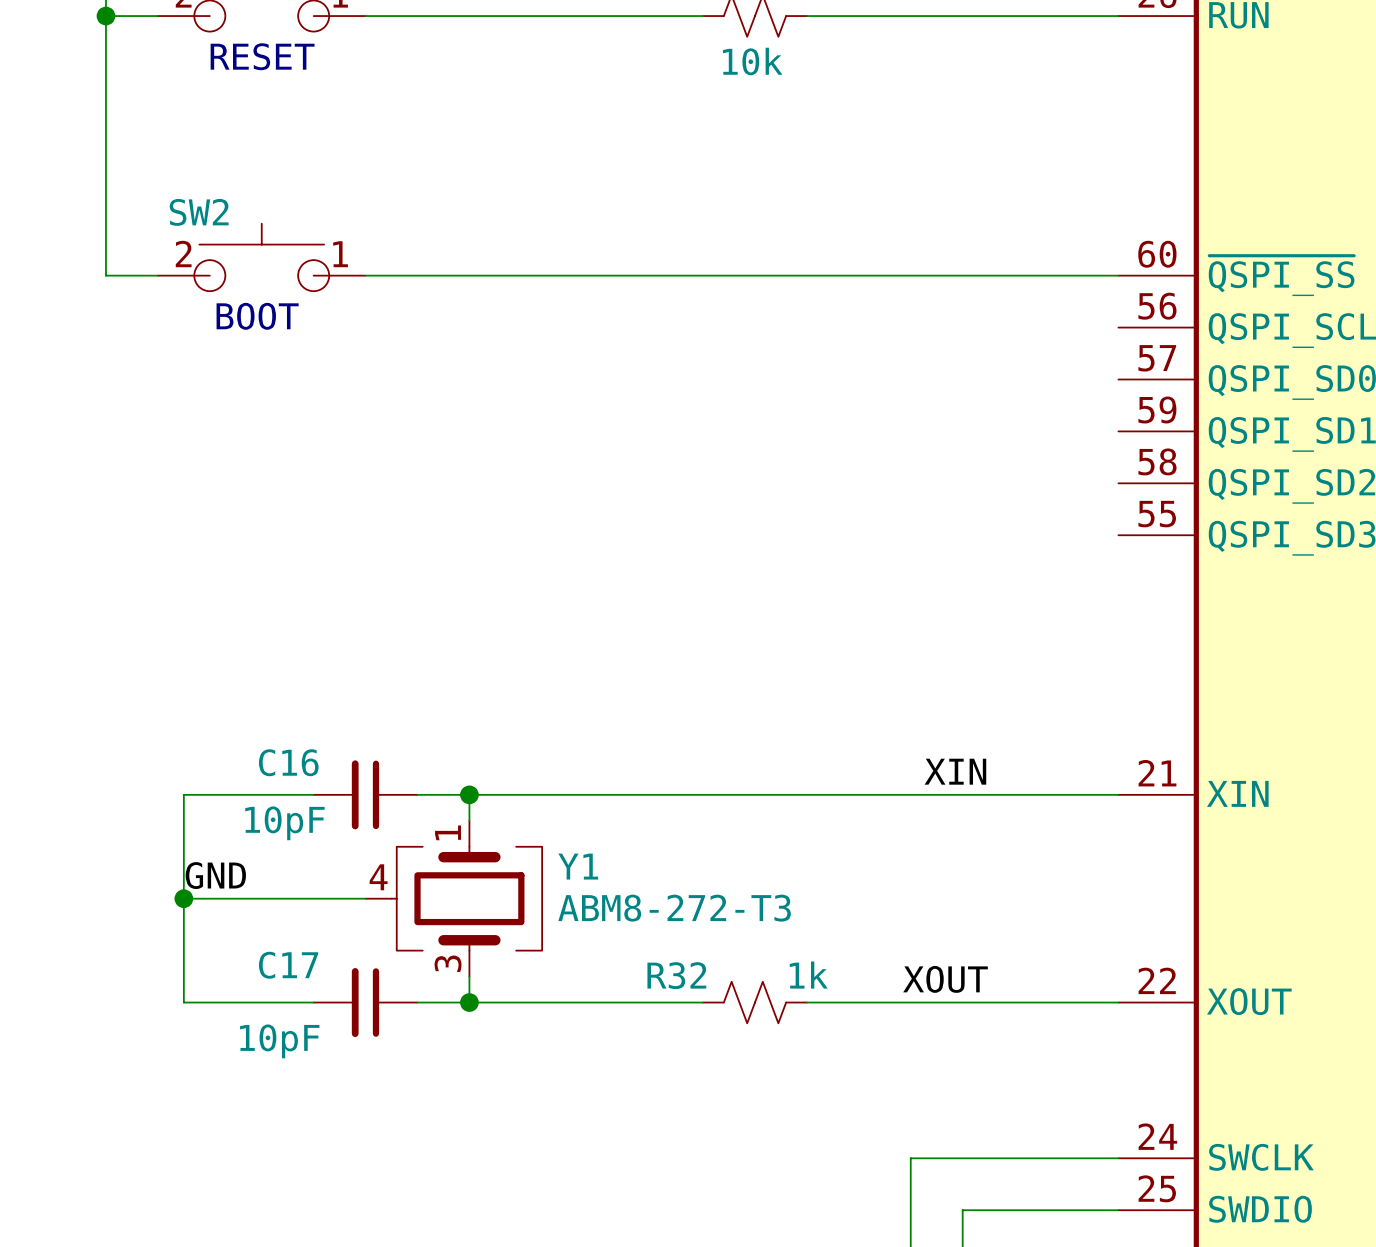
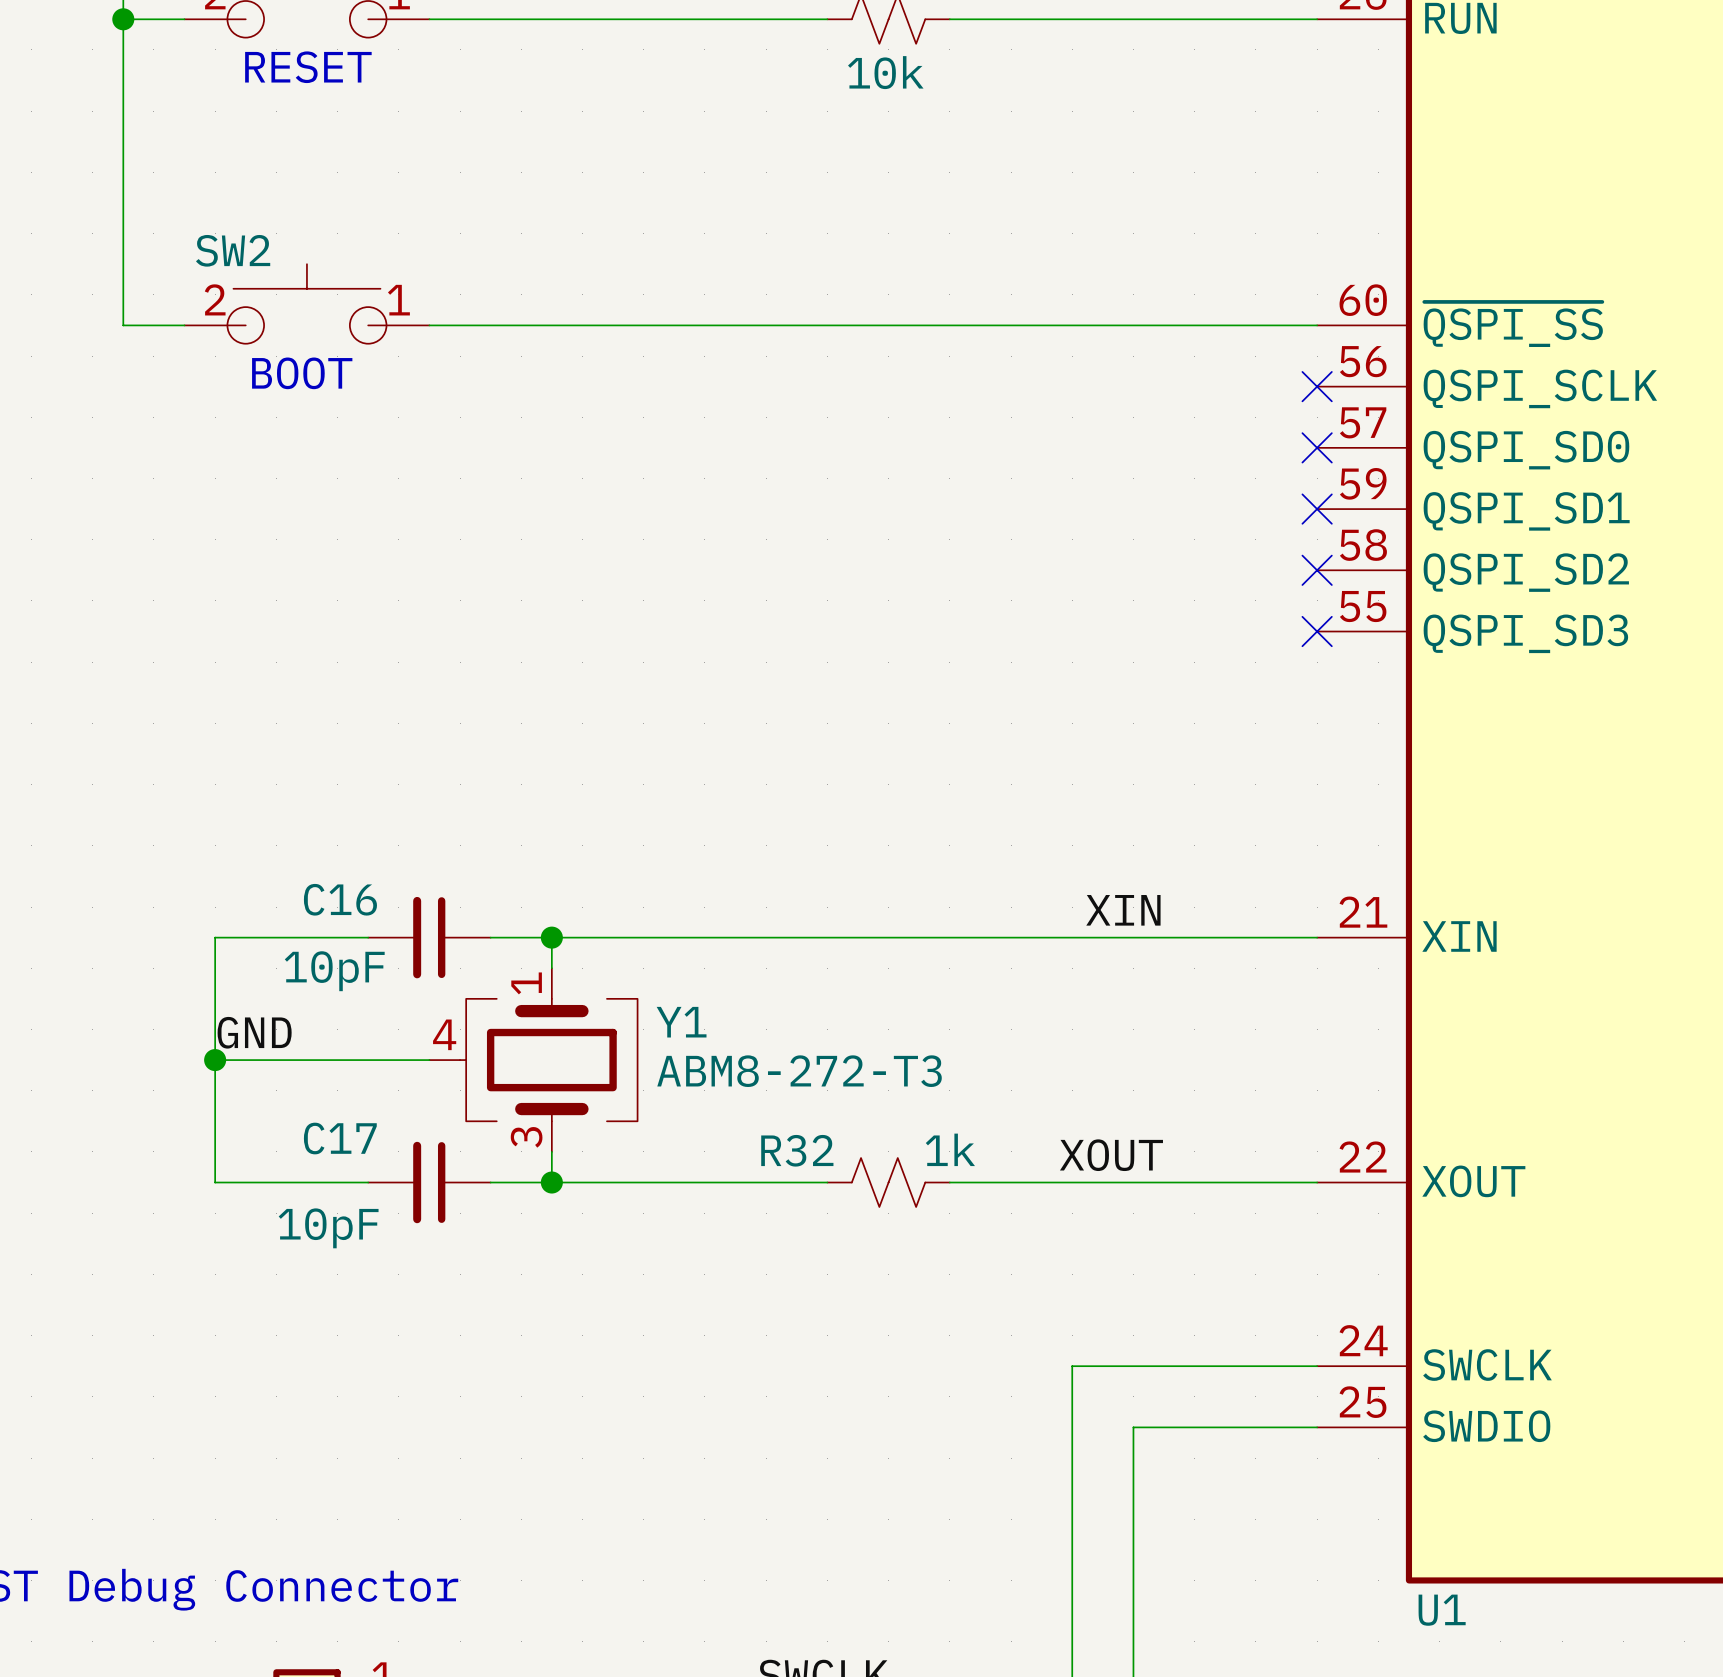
no-connect mark: none -> (1317, 386)
no-connect mark: none -> (1317, 447)
no-connect mark: none -> (1317, 509)
no-connect mark: none -> (1317, 570)
no-connect mark: none -> (1317, 631)

